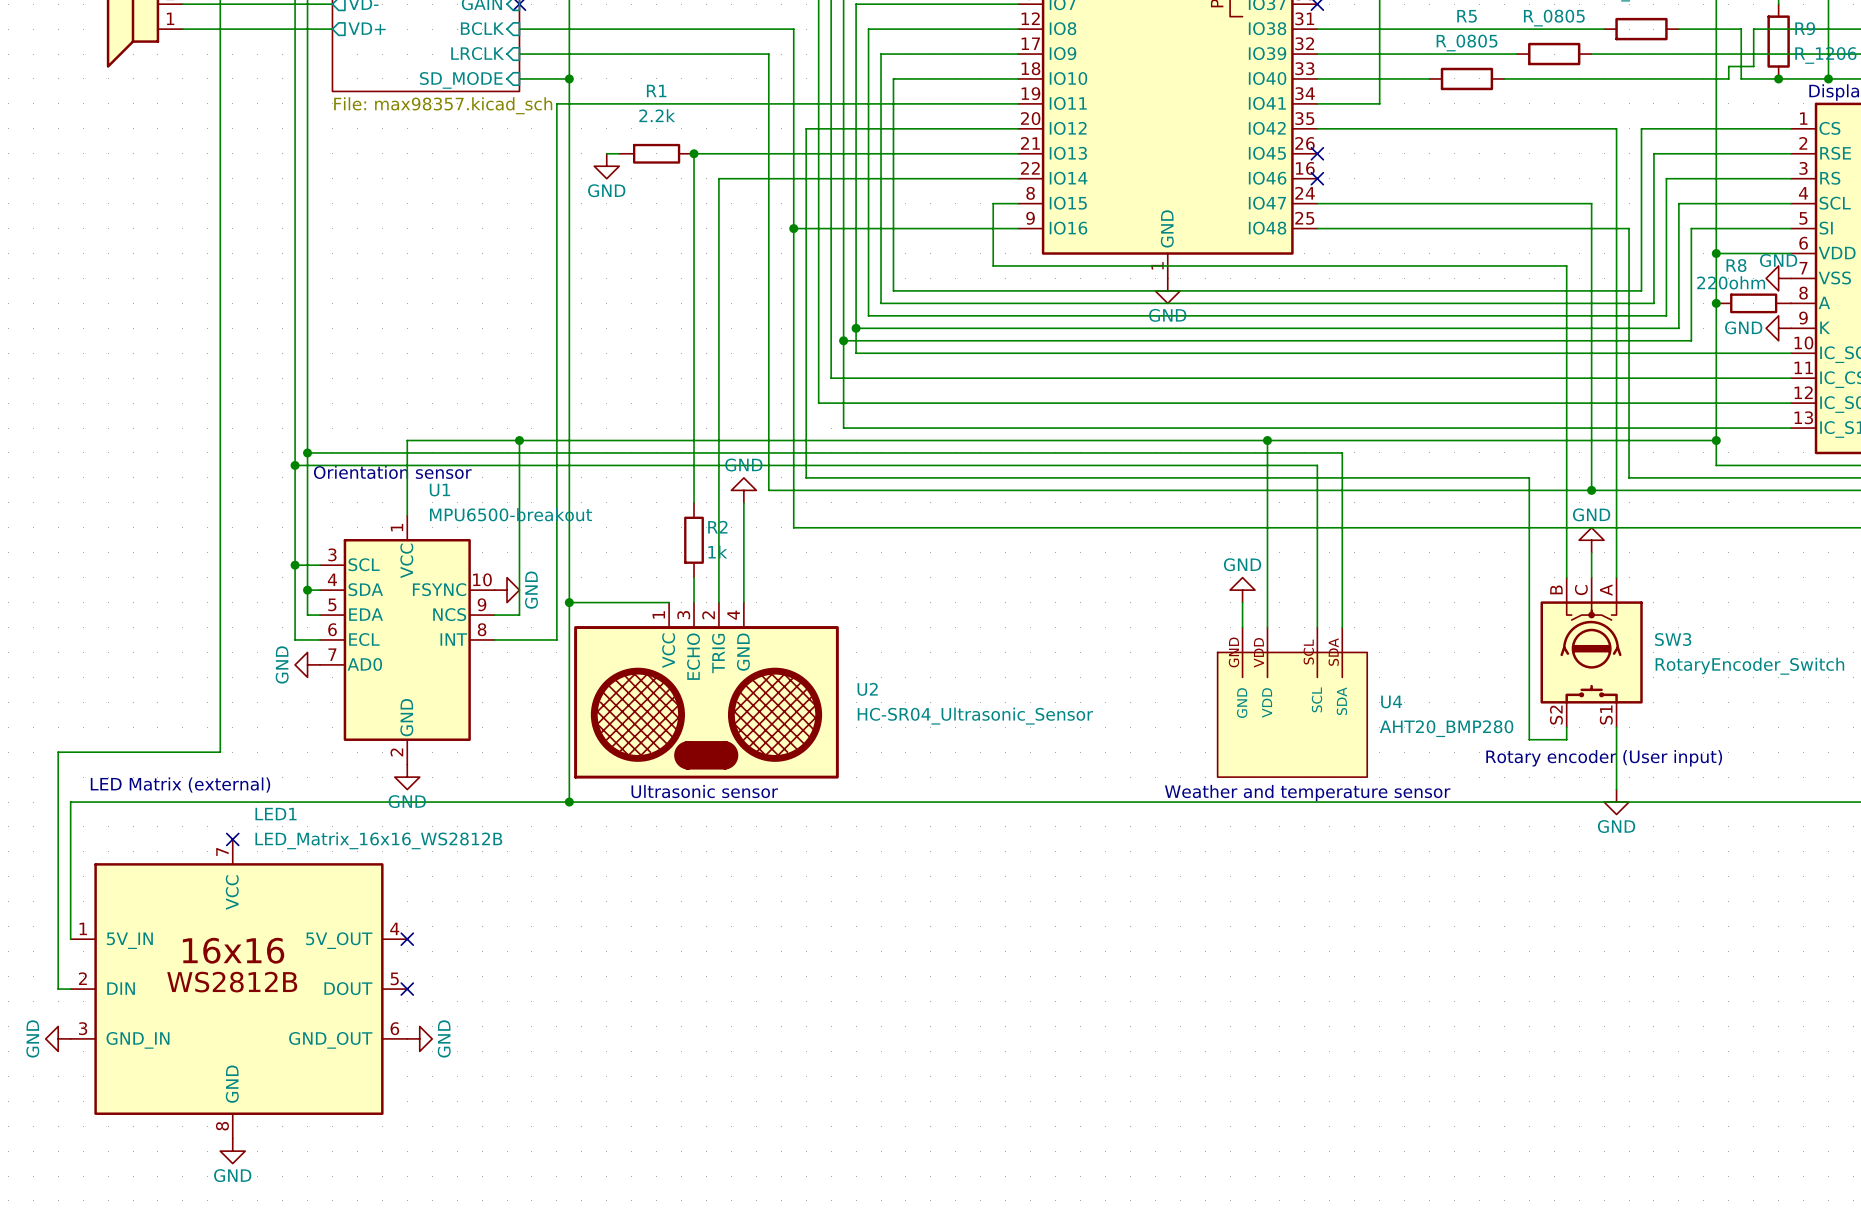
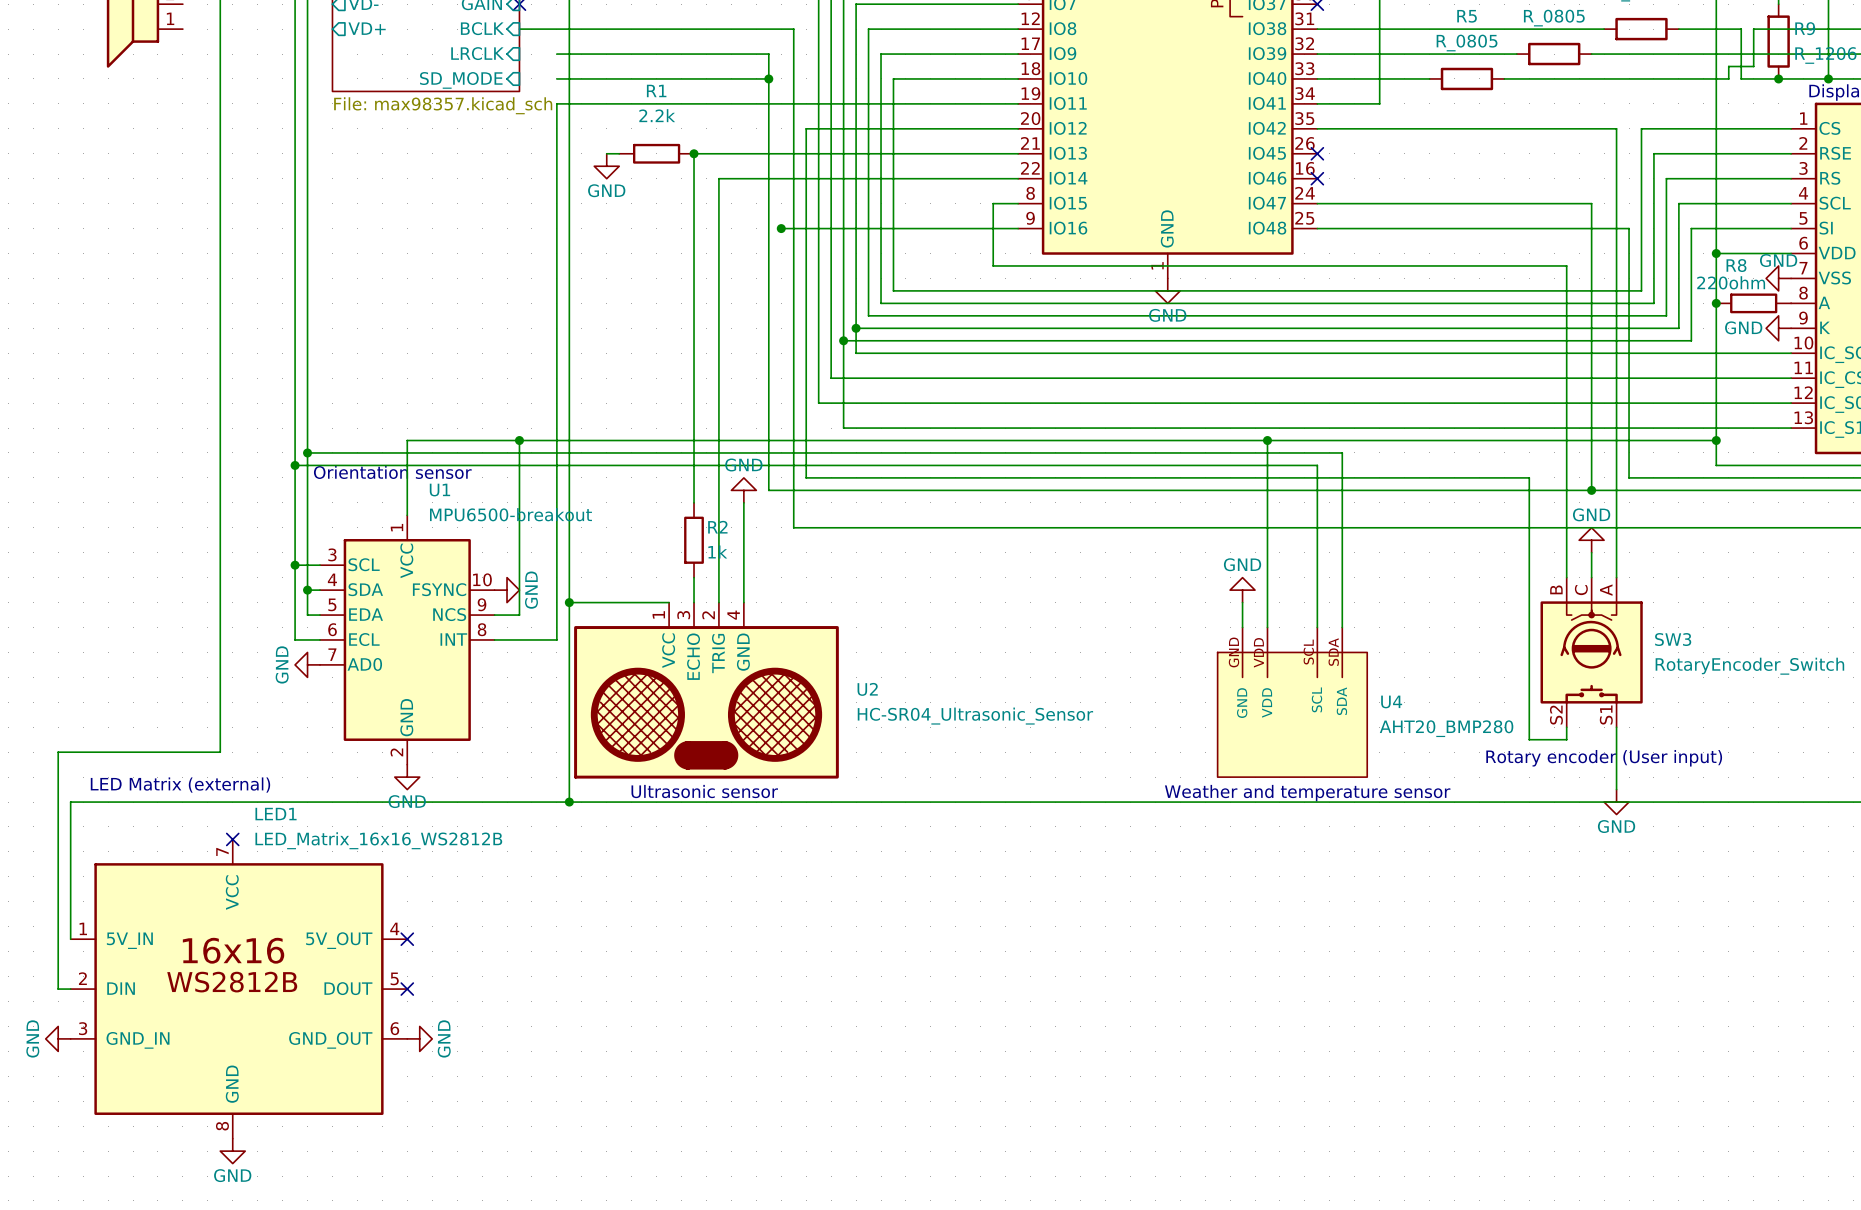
wire: (182, 4) (332, 4) -> none
wire: (182, 29) (332, 29) -> none
wire: (519, 54) (556, 54) -> none
wire: (519, 78) (556, 78) -> none
wire: none -> (569, 78) (768, 78)
junction: (569, 78) -> none
junction: none -> (768, 78)
wire: none -> (781, 228) (793, 228)
junction position: (793, 228) -> (781, 228)

